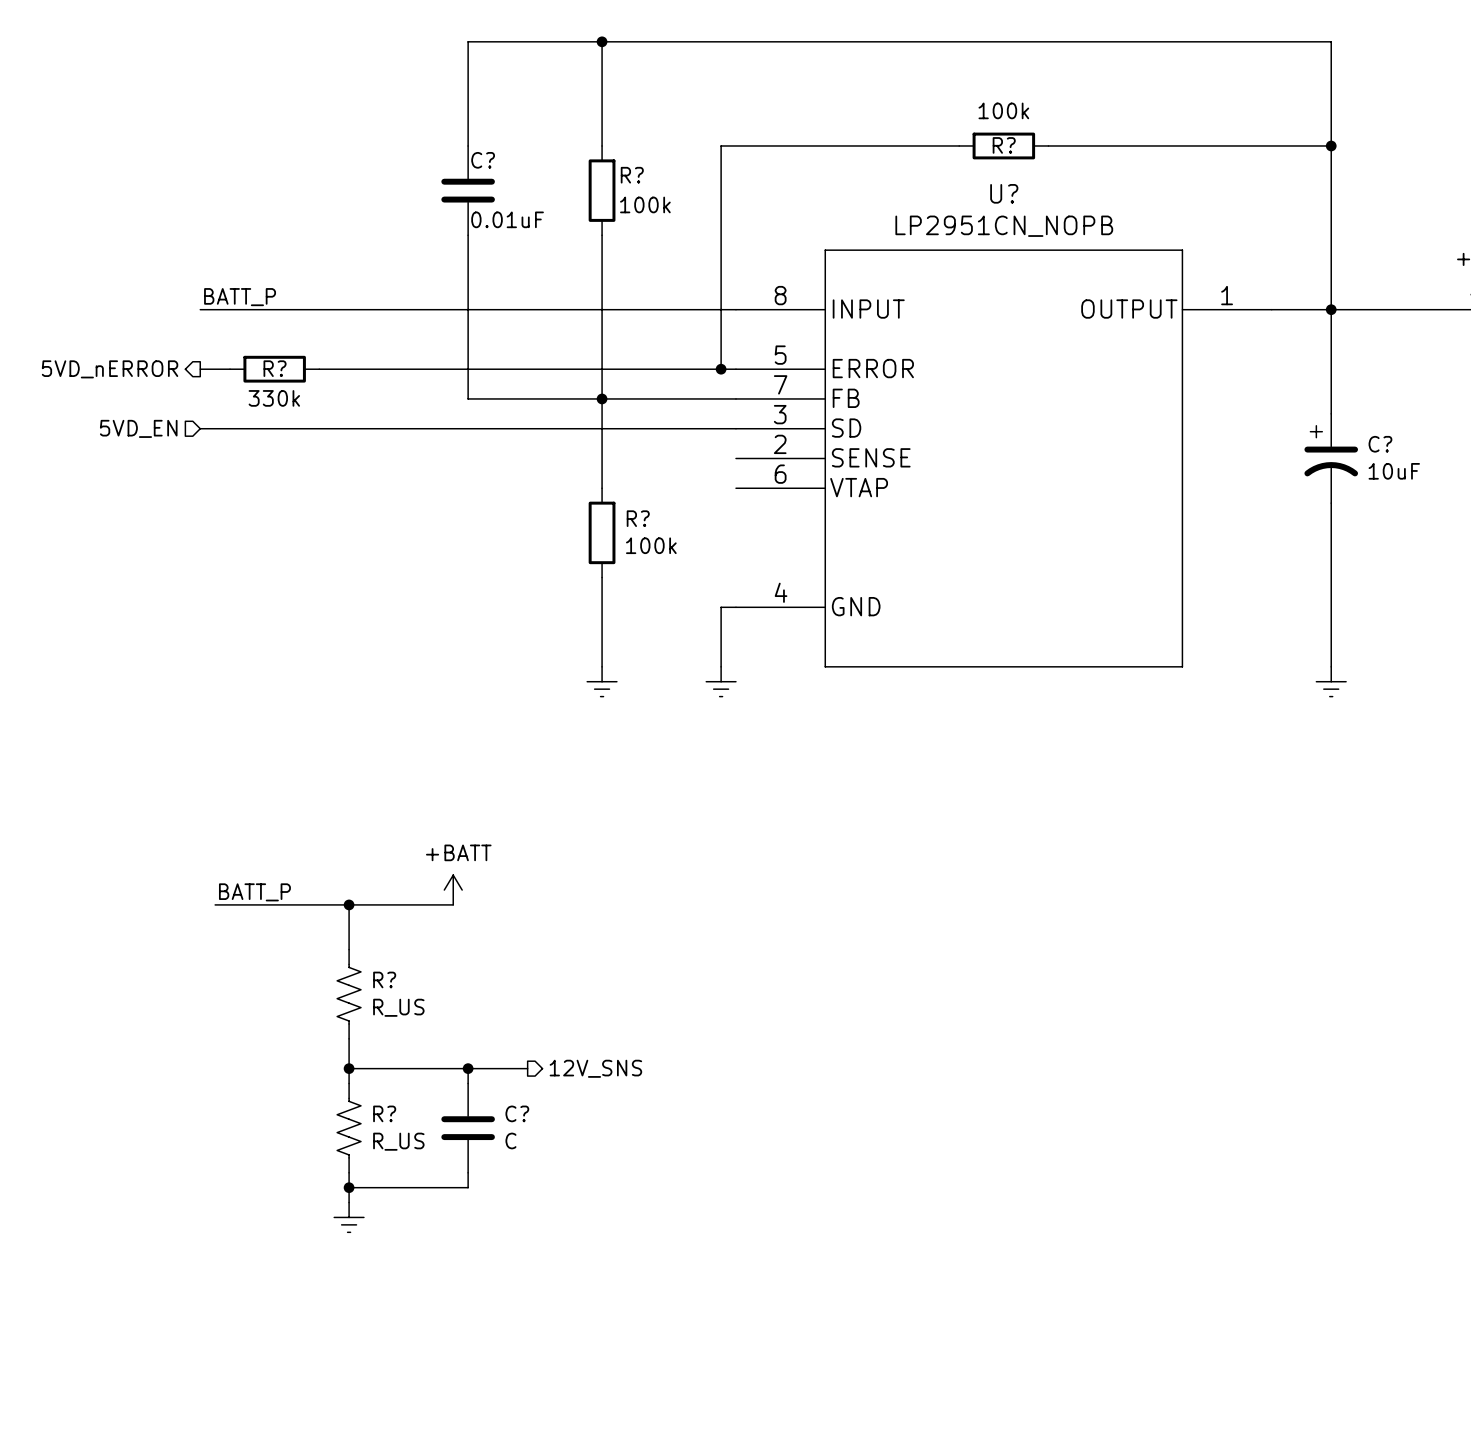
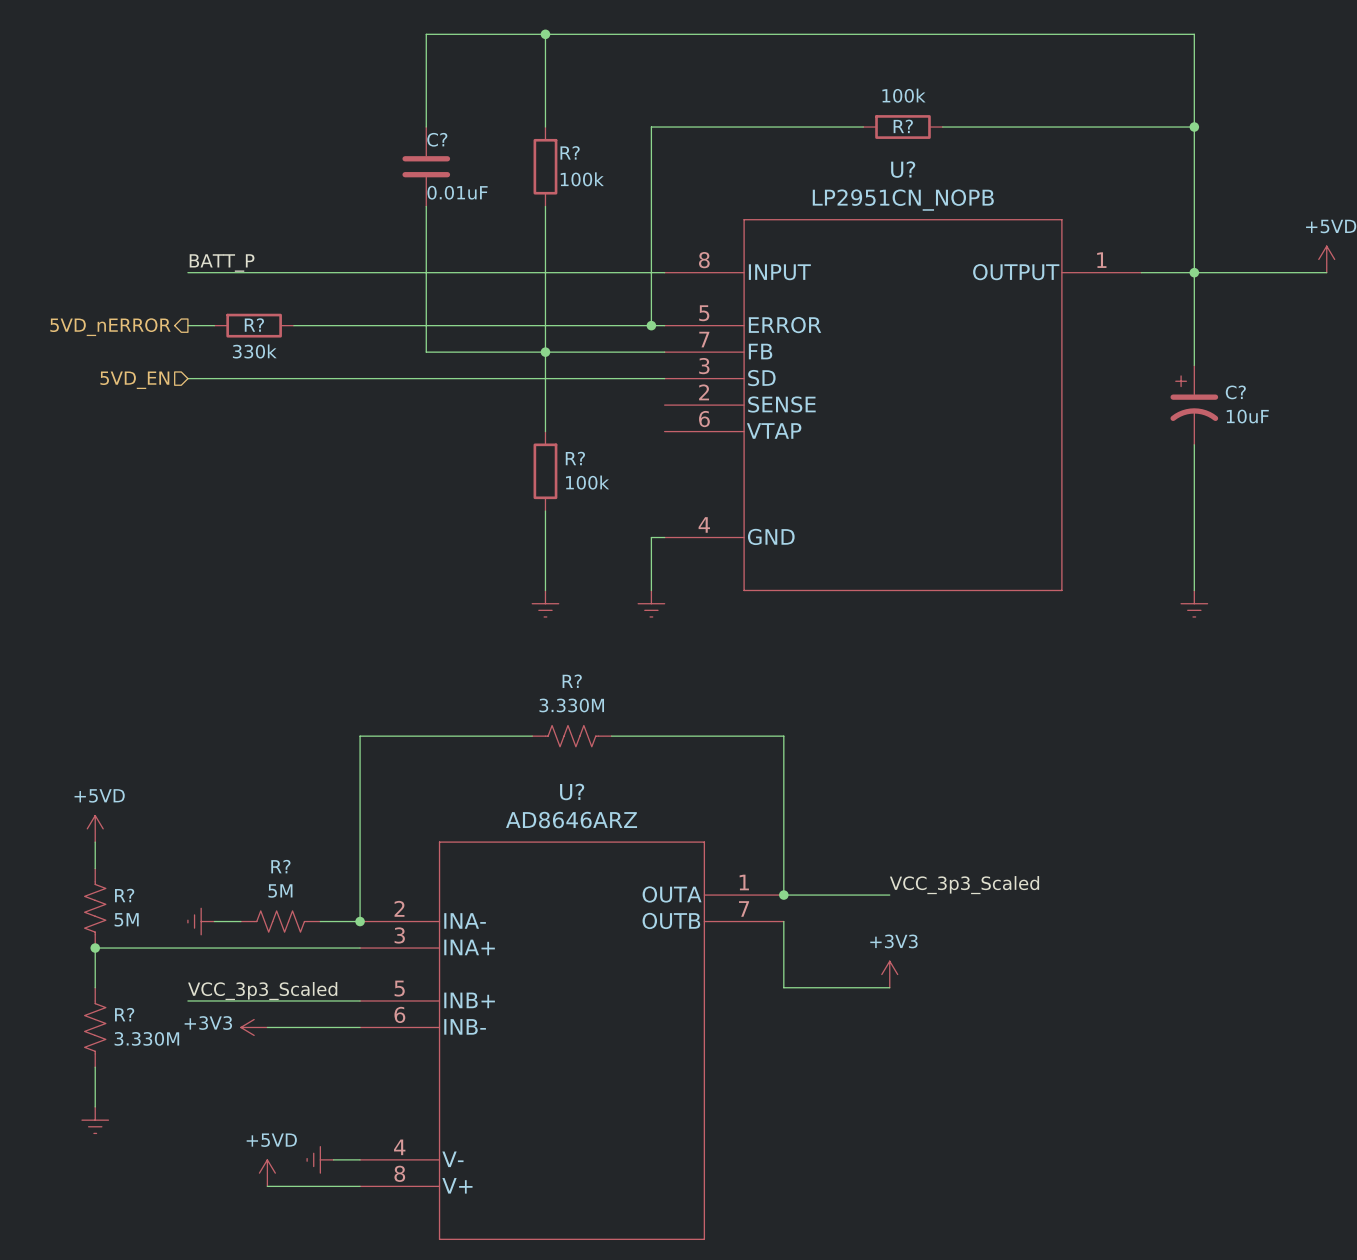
R?: none -> 3.330M (571, 736)
wire: none -> (611, 736) (783, 736) (783, 895) (889, 895)
power symbol: +BATT (453, 890) -> none
label: BATT_P (254, 892) -> none
wire: (215, 904) (453, 904) -> none
wire: (349, 904) (349, 949) -> none
junction: (349, 904) -> none
power symbol: none -> +5VD (95, 828)
wire: none -> (95, 842) (95, 868)
R?: R_US (349, 994) -> none
label: none -> VCC_3p3_Scaled (964, 885)
junction: none -> (783, 895)
R?: none -> 5M (95, 908)
power symbol: none -> (201, 921)
wire: none -> (214, 921) (240, 921)
R?: none -> 5M (280, 921)
wire: (349, 1038) (349, 1083) -> (320, 921) (360, 921) (360, 736) (532, 736)
junction: none -> (360, 921)
wire: none -> (783, 921) (783, 987) (889, 987)
junction: none -> (95, 948)
wire: none -> (320, 948) (95, 948) (95, 987)
junction: (349, 1068) -> none
wire: (468, 1068) (468, 1083) -> none
junction: (468, 1068) -> none
hierarchical label: 12V_SNS (595, 1068) -> none
power symbol: none -> +3V3 (889, 974)
label: none -> VCC_3p3_Scaled (262, 991)
wire: none -> (187, 1000) (360, 1000)
R?: R_US (349, 1128) -> none
C?: C (468, 1128) -> none
R?: none -> 3.330M (95, 1027)
power symbol: none -> +3V3 (254, 1027)
wire: none -> (267, 1027) (360, 1027)
wire: (349, 1172) (349, 1202) -> none
wire: (468, 1172) (468, 1187) (349, 1187) -> none
U?: none -> AD8646ARZ (571, 1040)
junction: (349, 1187) -> none
wire: none -> (95, 1067) (95, 1106)
power symbol rotation: 0° (349, 1217) -> 90° clockwise (320, 1159)
power symbol position: (349, 1217) -> (320, 1159)
power symbol: none -> (95, 1120)
wire: none -> (333, 1159) (360, 1159)
power symbol: none -> +5VD (267, 1173)
wire: none -> (267, 1186) (360, 1186)

